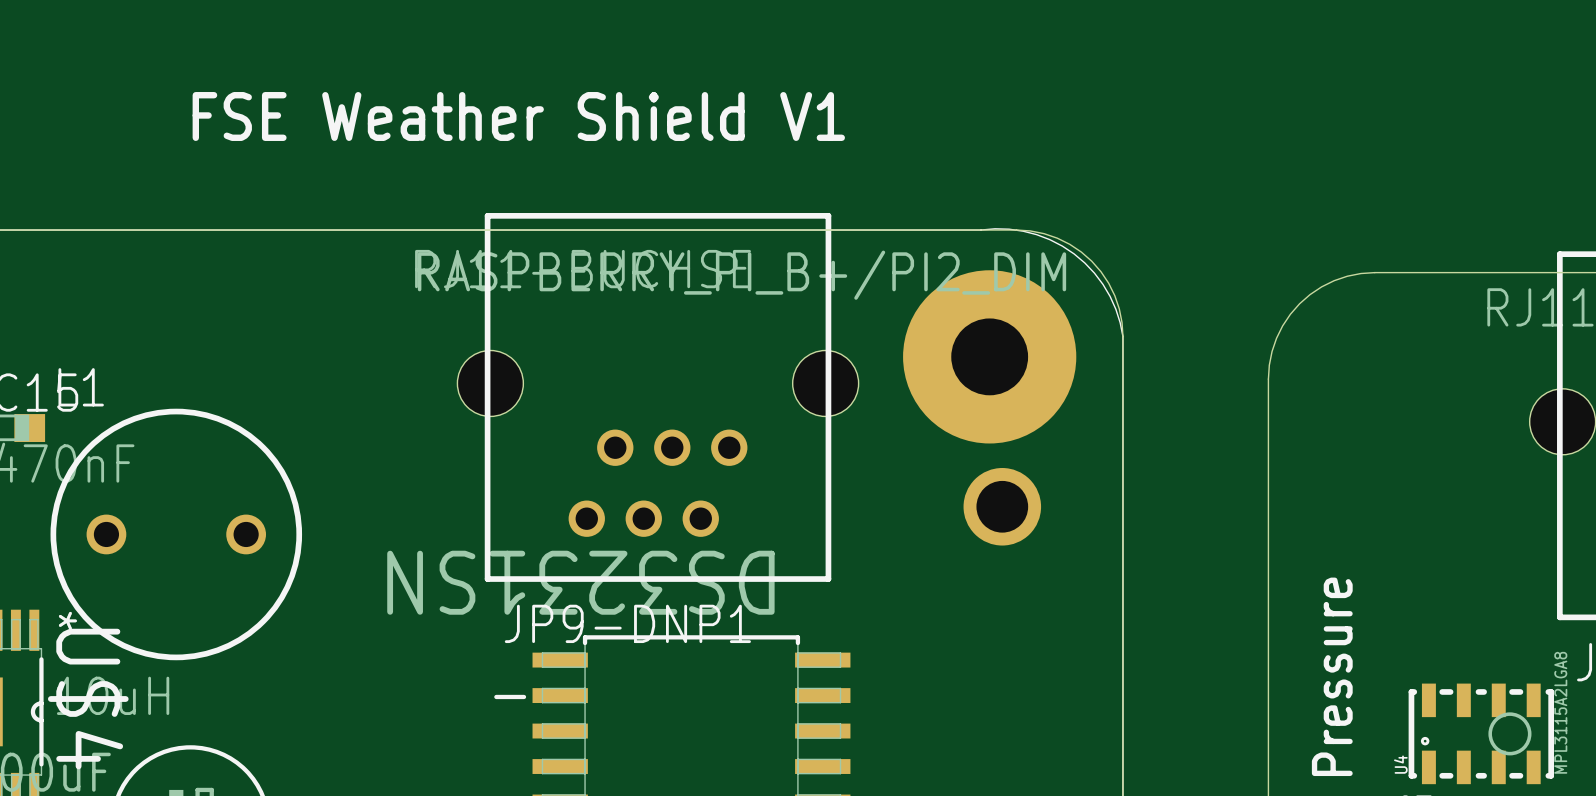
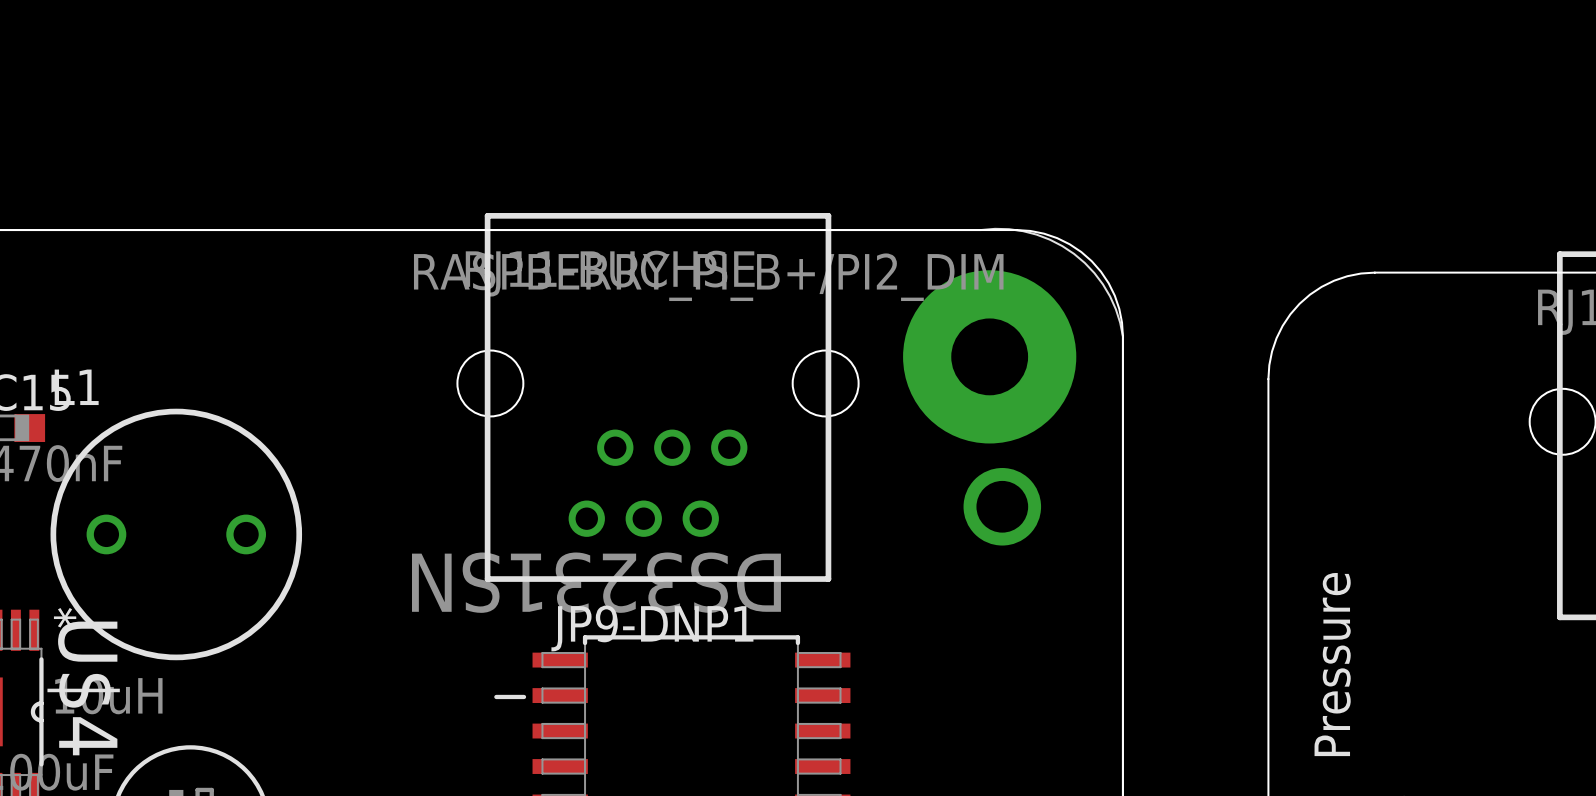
text: FSE Weather Shield V1 (518, 116) -> none
U4: MPL3115A2LGA8 (1481, 733) -> none

